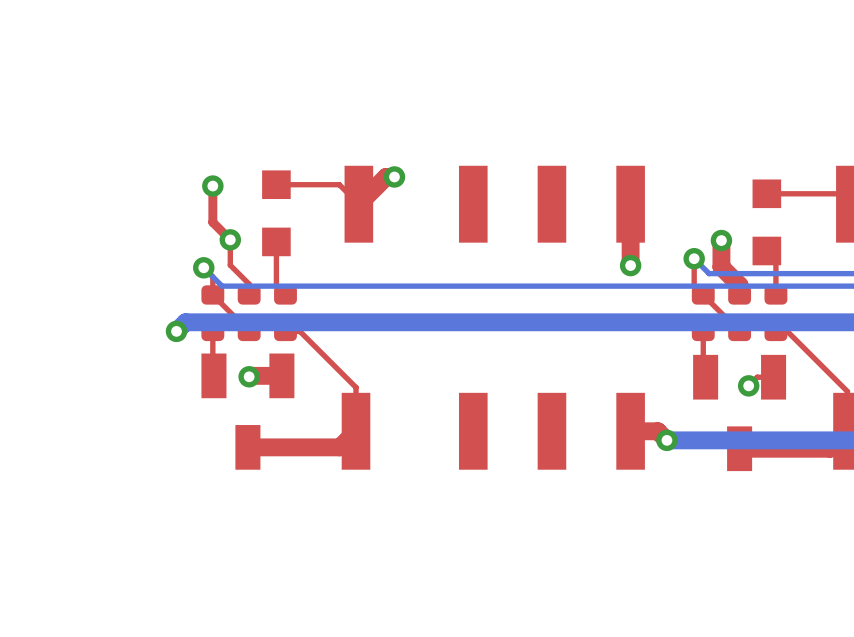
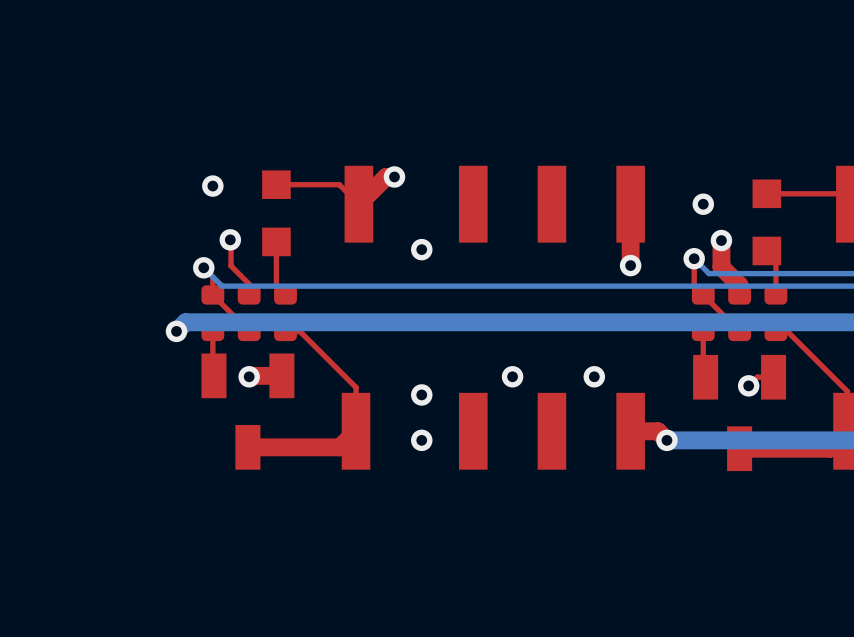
top track: (212, 186) (212, 222) (230, 239) (230, 265) (249, 284) -> (231, 240) (231, 265) (249, 284)
via: none -> (703, 204)
via: none -> (421, 249)
via: none -> (512, 376)
via: none -> (594, 376)
via: none -> (421, 394)
via: none -> (421, 440)

